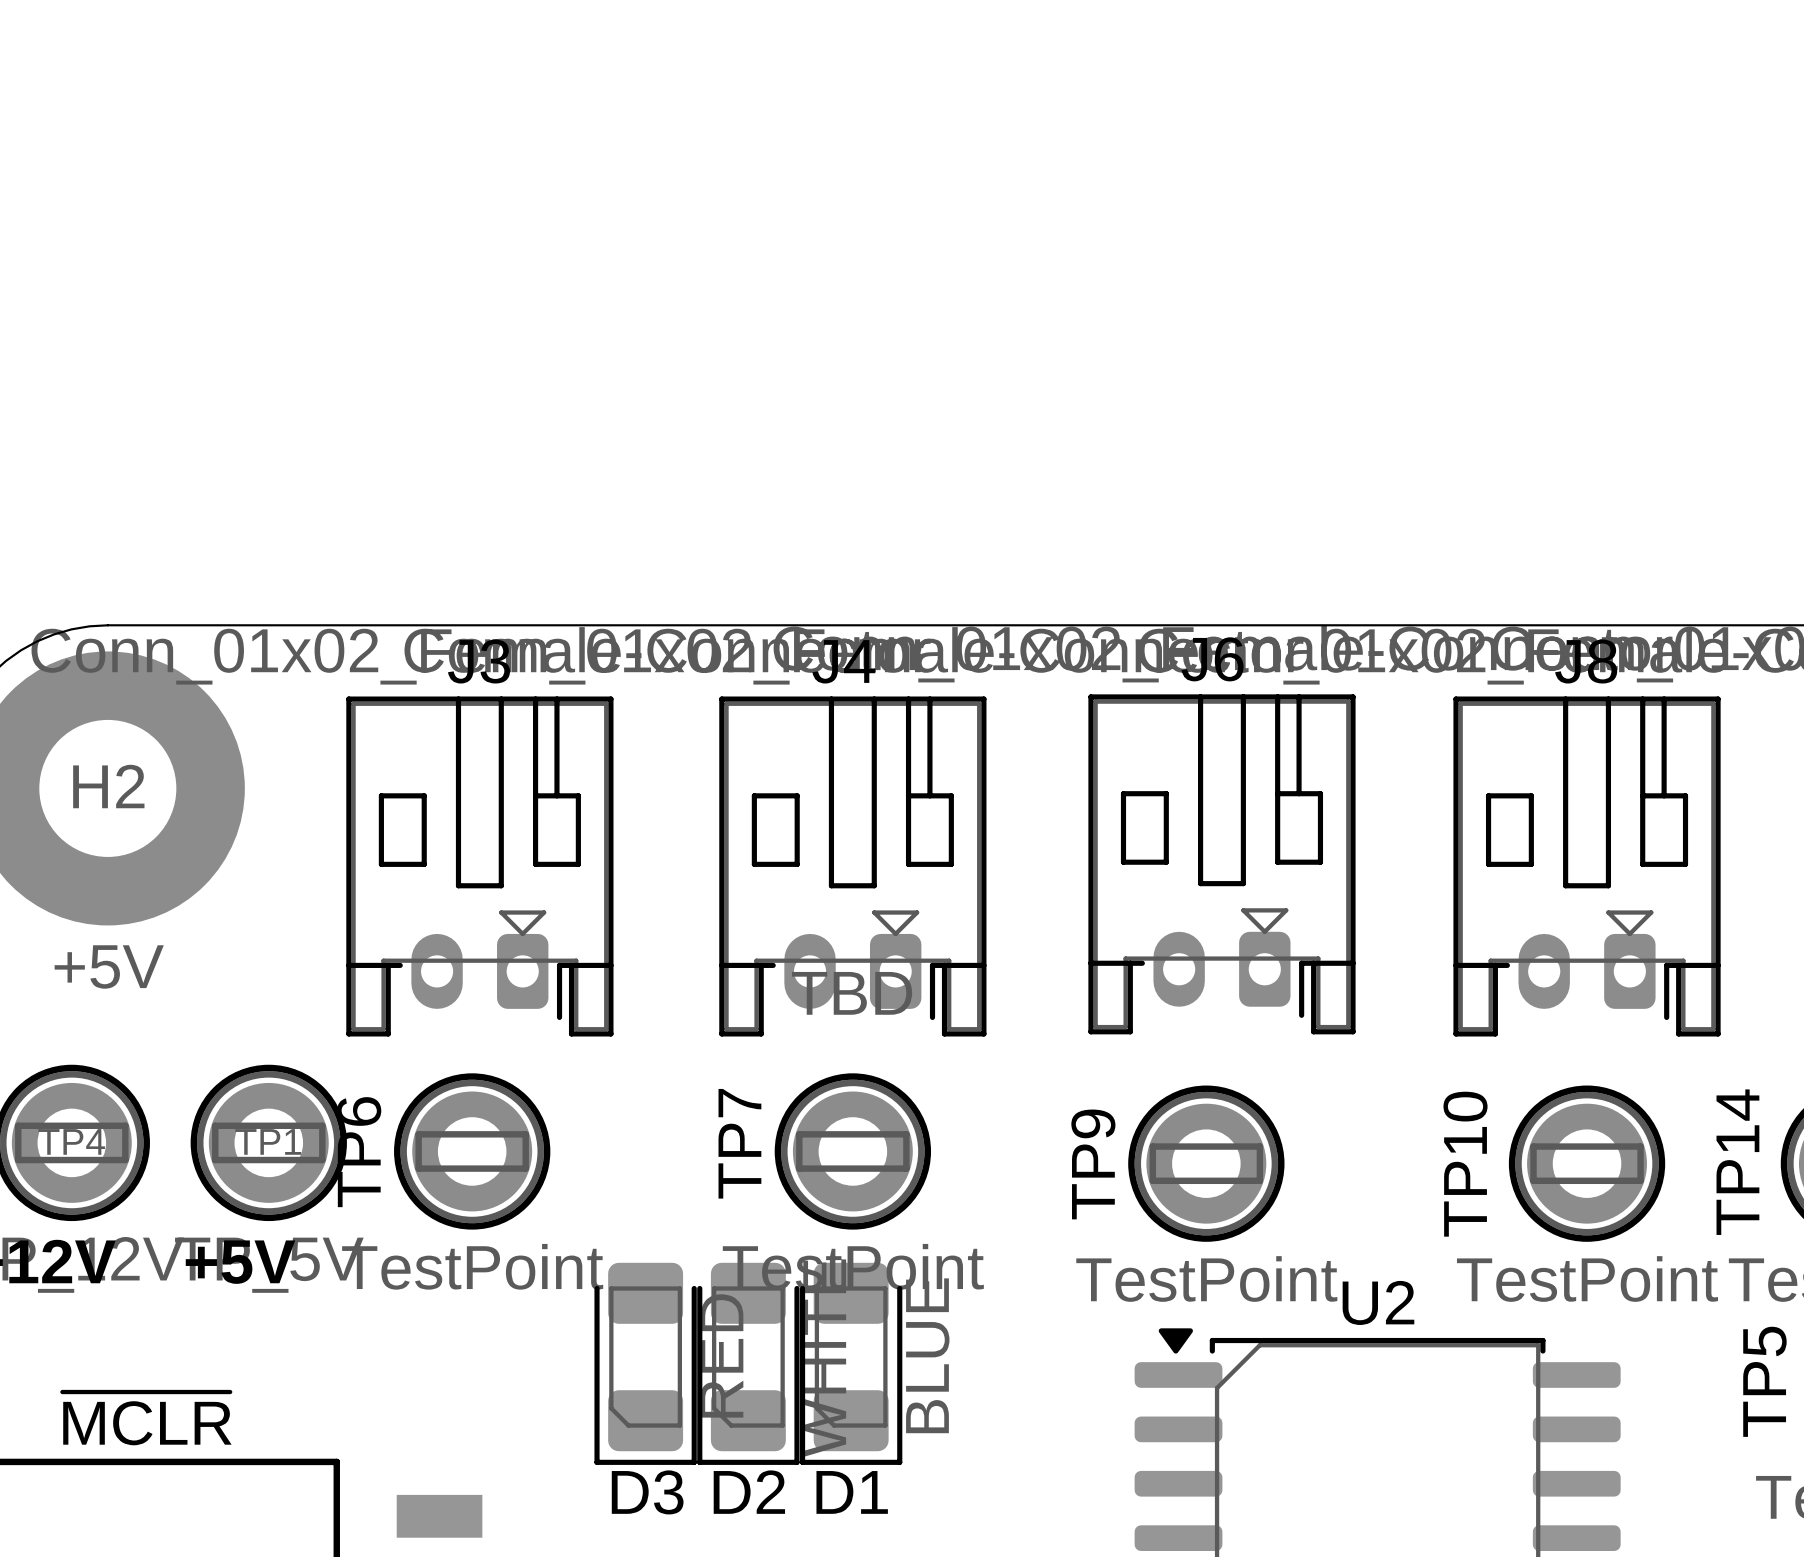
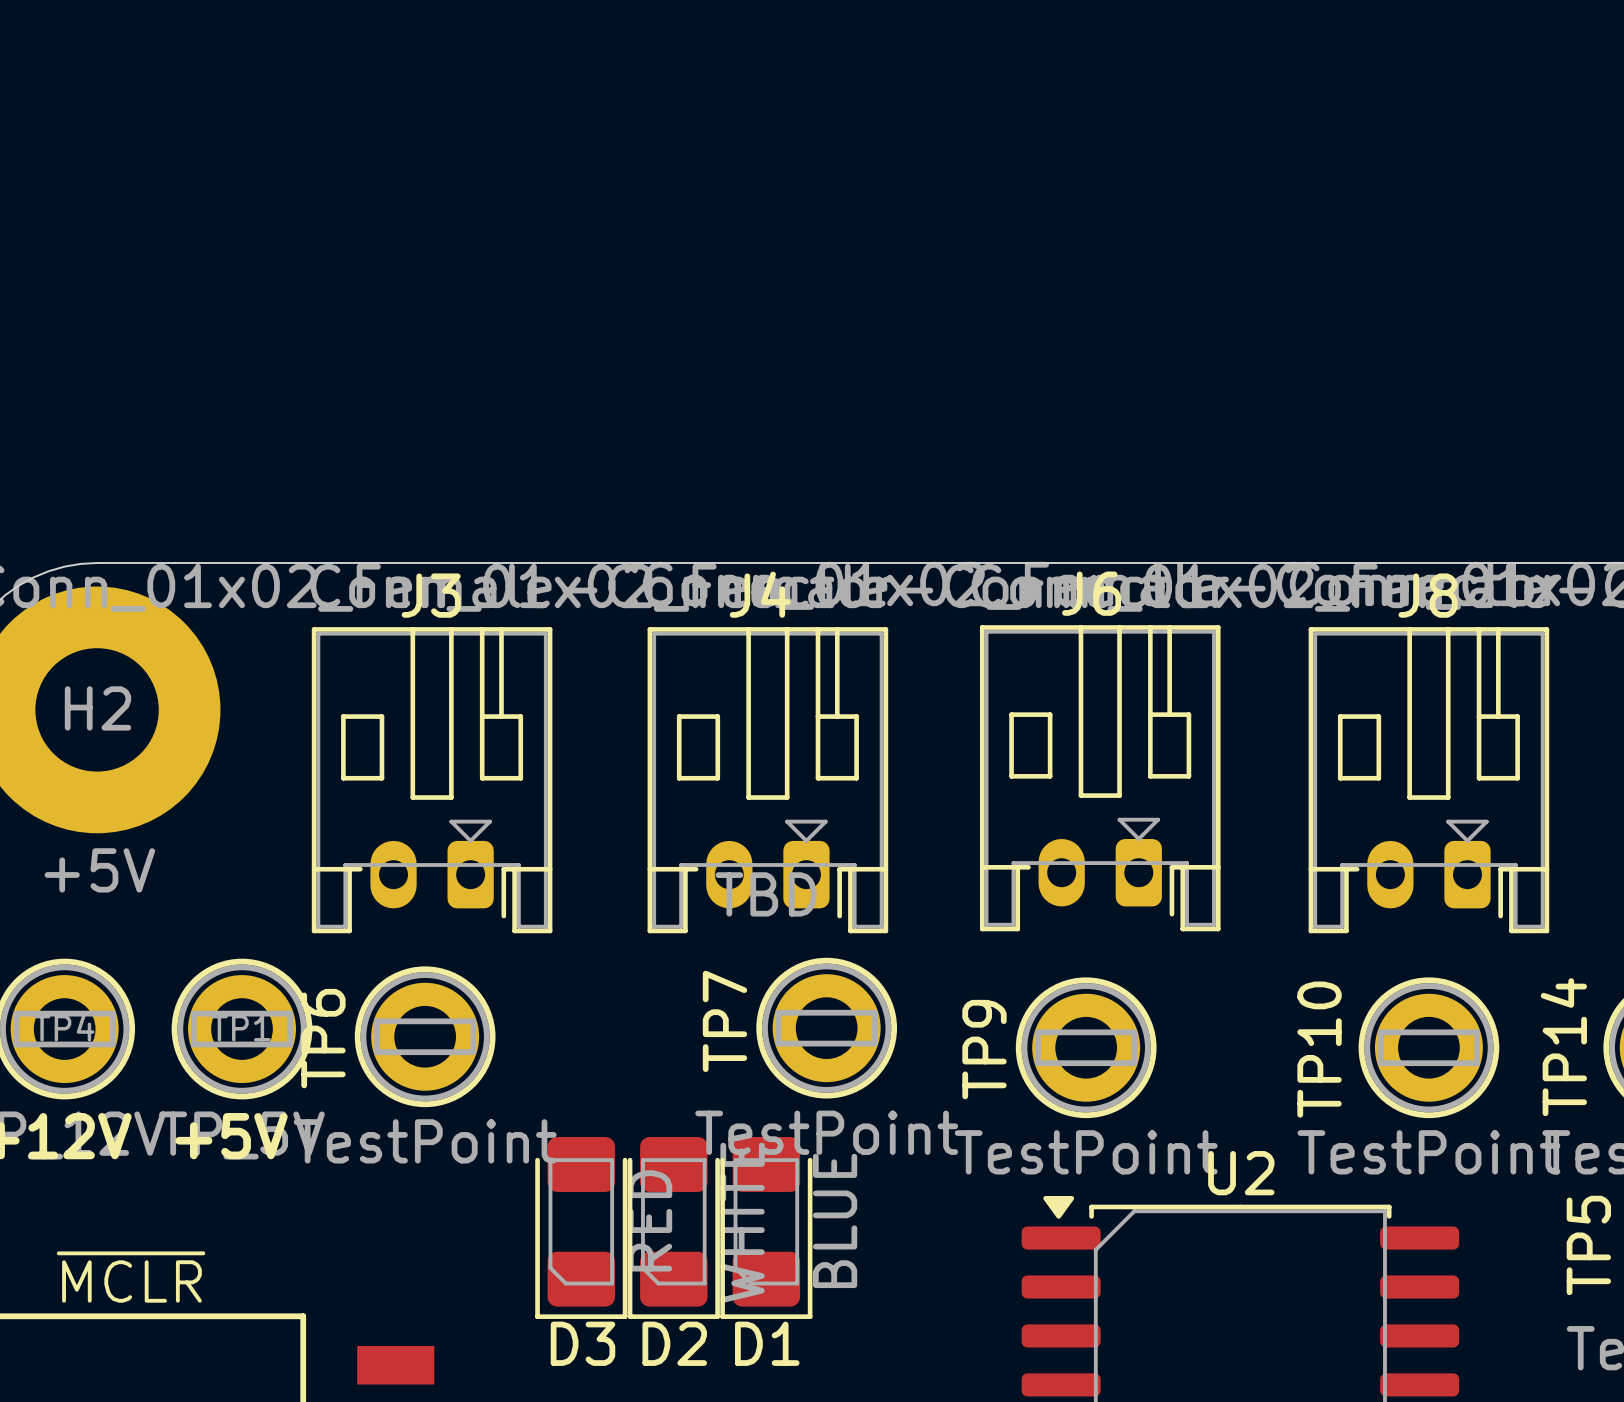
TP7 position: (852, 1151) -> (826, 1028)

